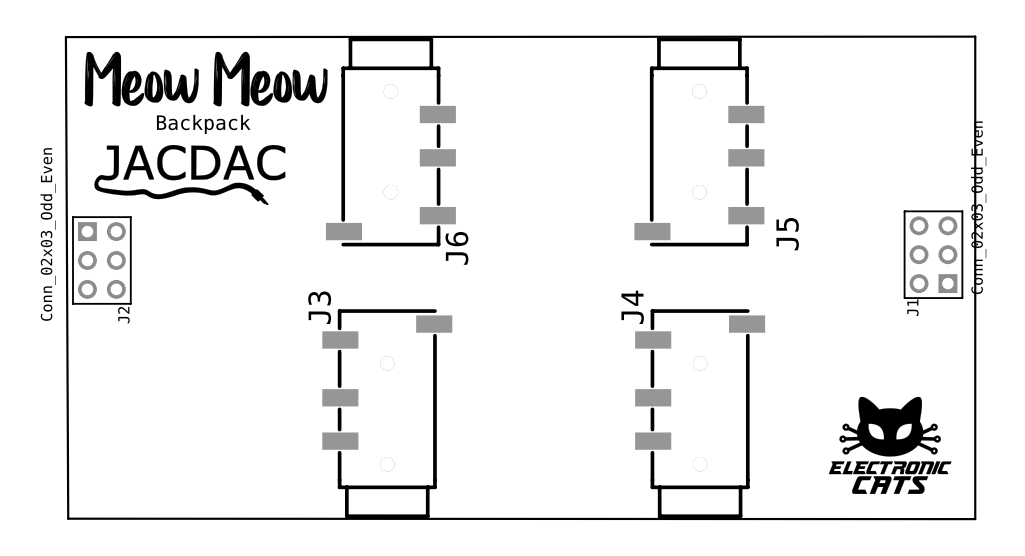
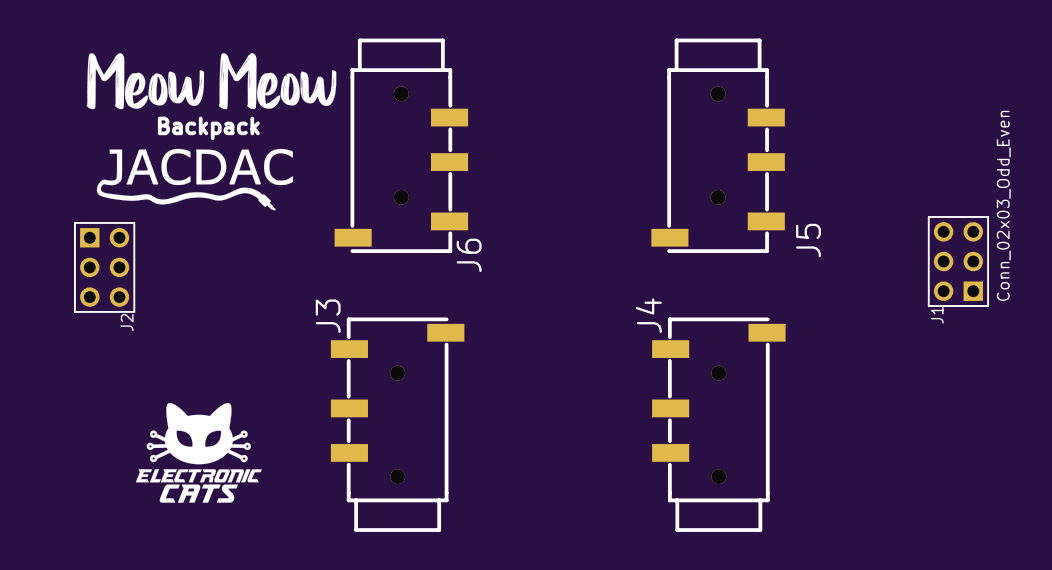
board edge: (975, 36) (975, 519) (68, 518) (65, 37) (975, 36) -> none
J2 value: Conn_02x03_Odd_Even (48, 234) -> none
drawing: none -> [135, 403, 262, 503]
drawing: [828, 396, 952, 494] -> none

